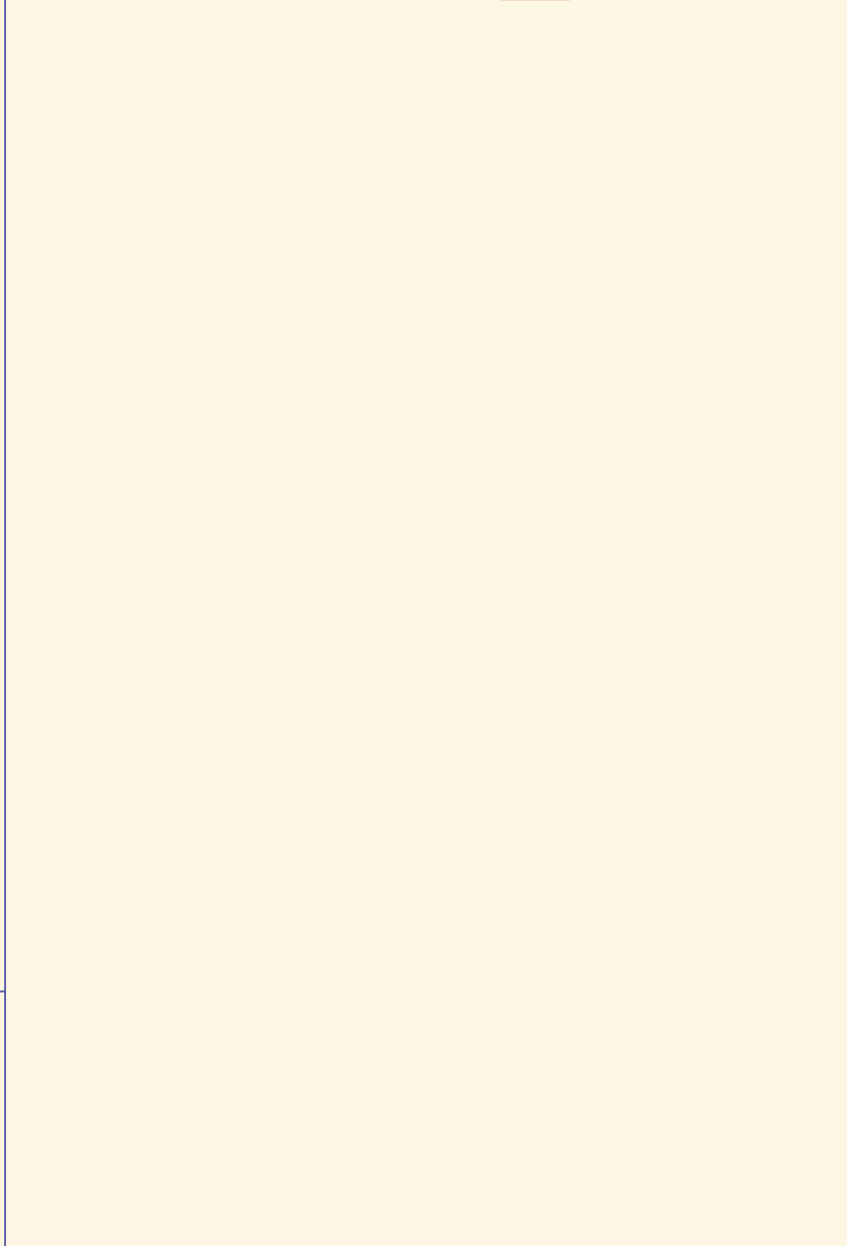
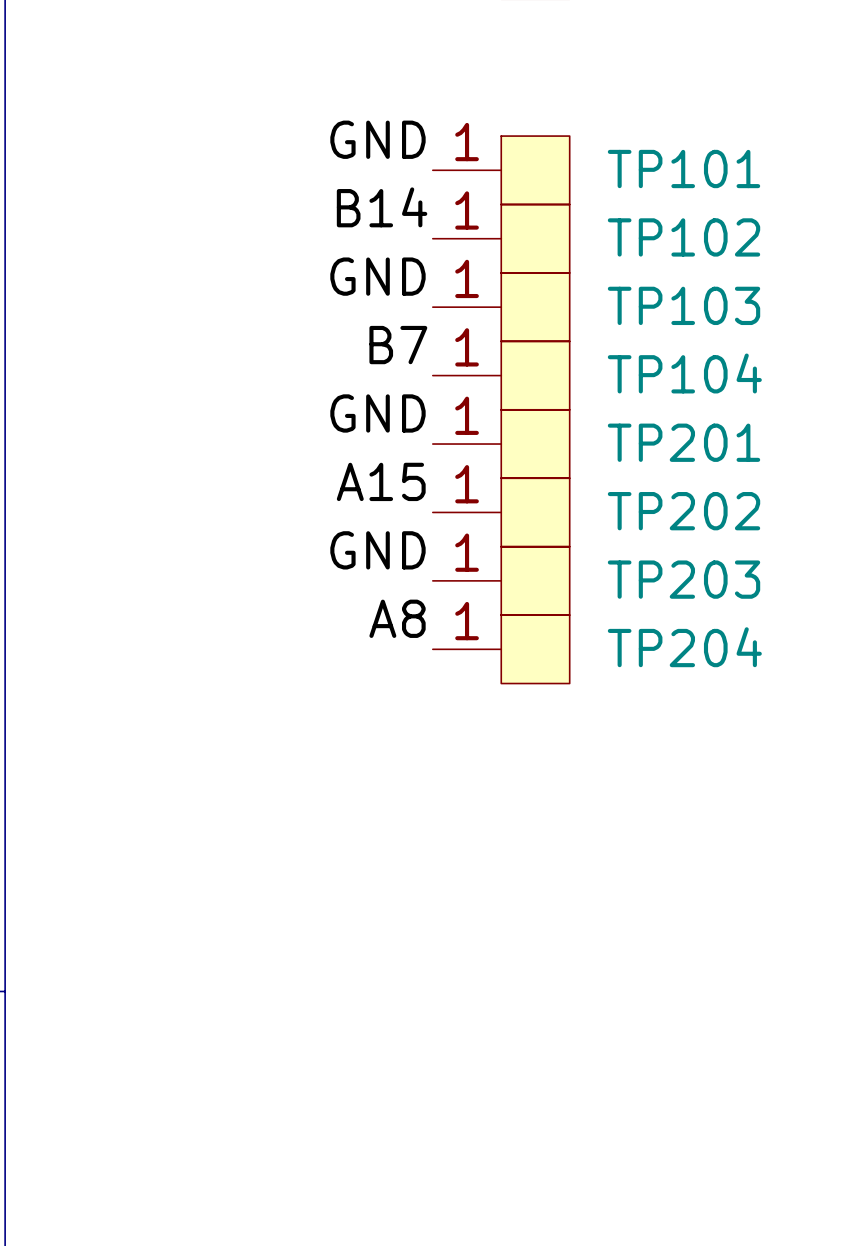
label: none -> GND (377, 139)
TP101: none -> (501, 170)
label: none -> B14 (382, 207)
TP102: none -> (501, 238)
label: none -> GND (377, 276)
TP103: none -> (501, 307)
label: none -> B7 (398, 345)
TP104: none -> (501, 375)
label: none -> GND (377, 413)
TP201: none -> (501, 444)
label: none -> A15 (381, 481)
TP202: none -> (501, 512)
label: none -> GND (377, 550)
TP203: none -> (501, 580)
label: none -> A8 (397, 618)
TP204: none -> (501, 649)

